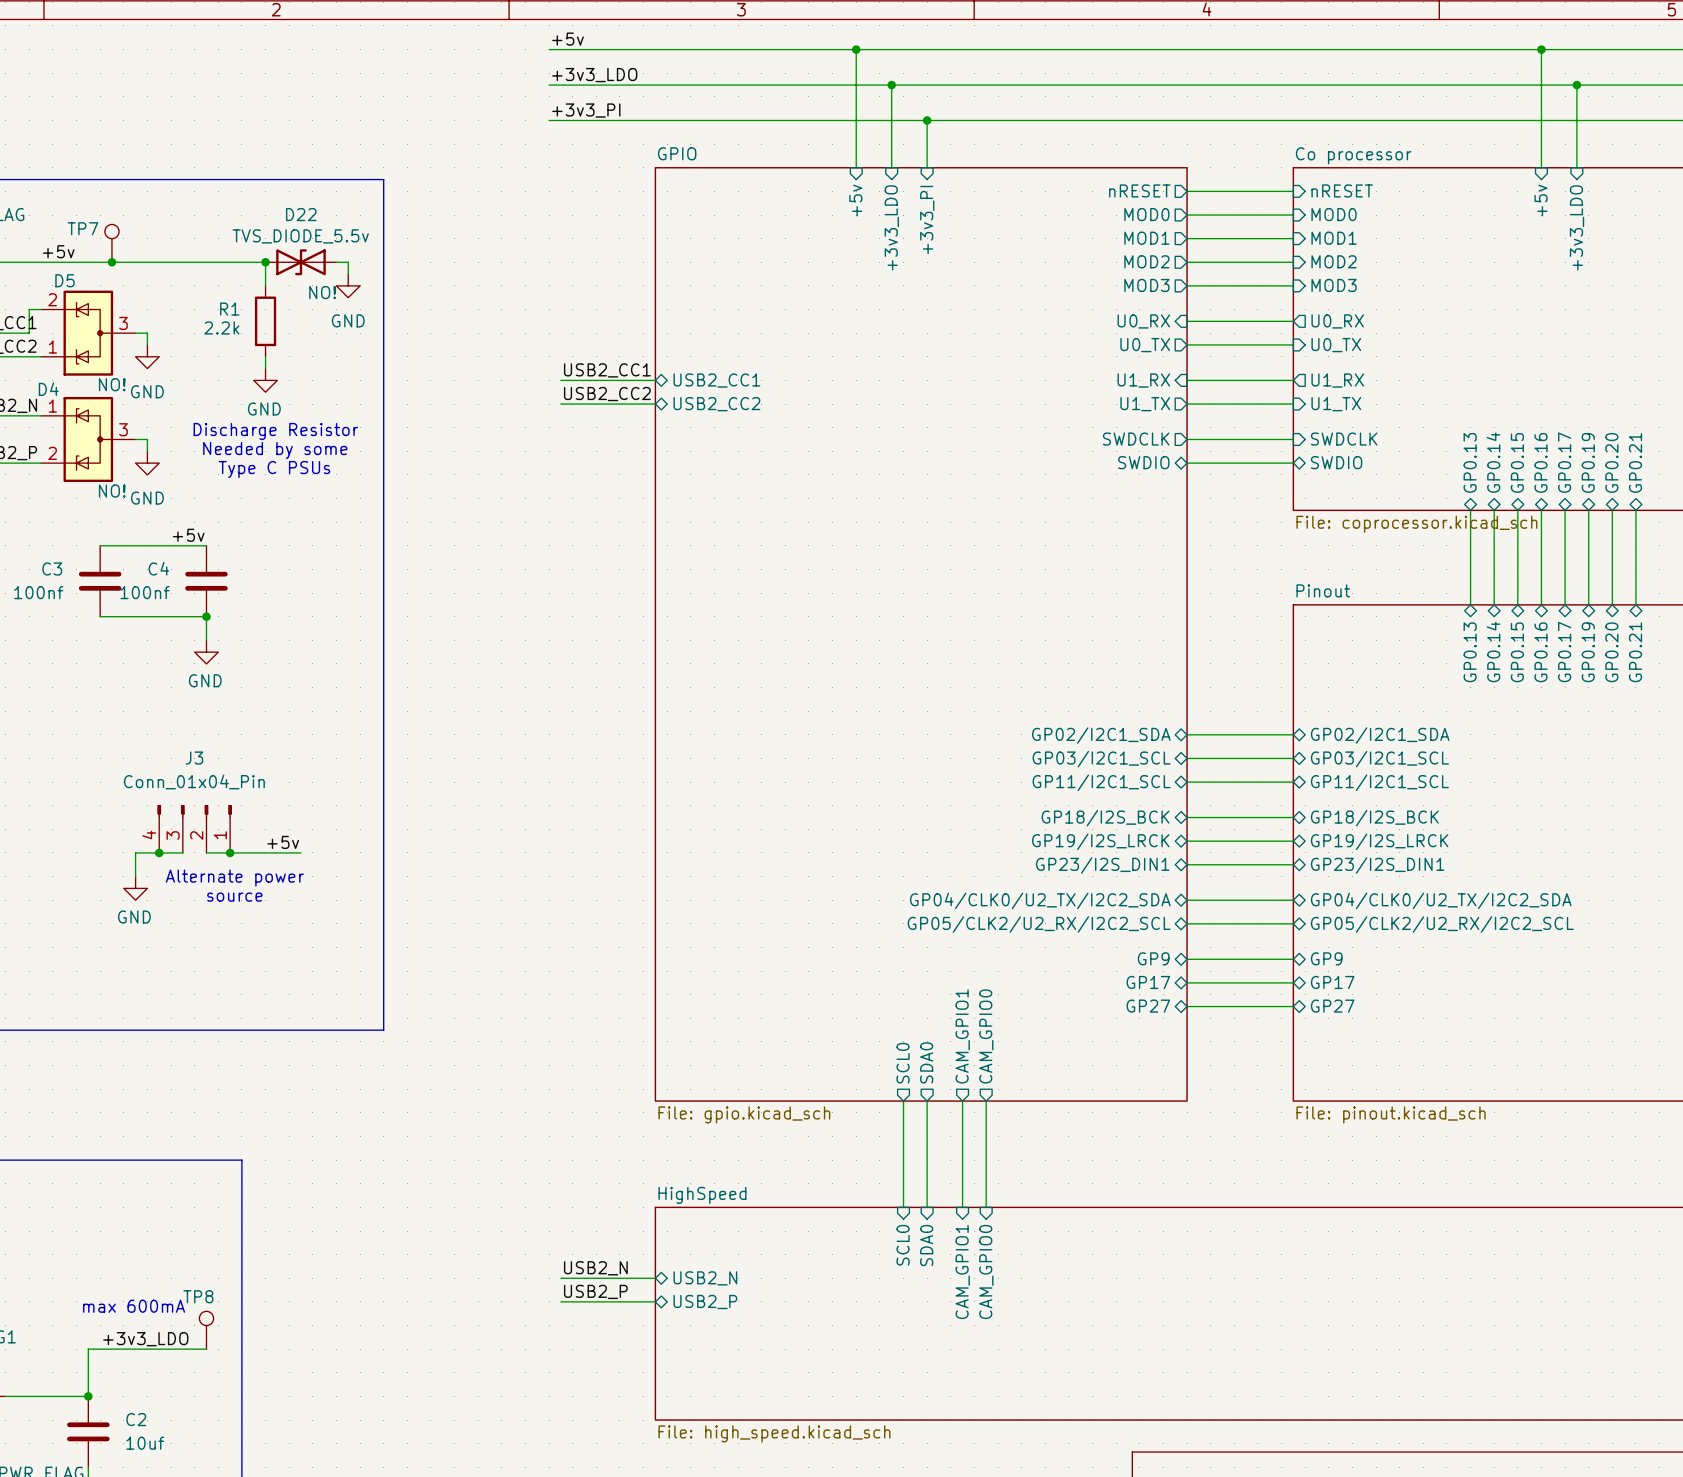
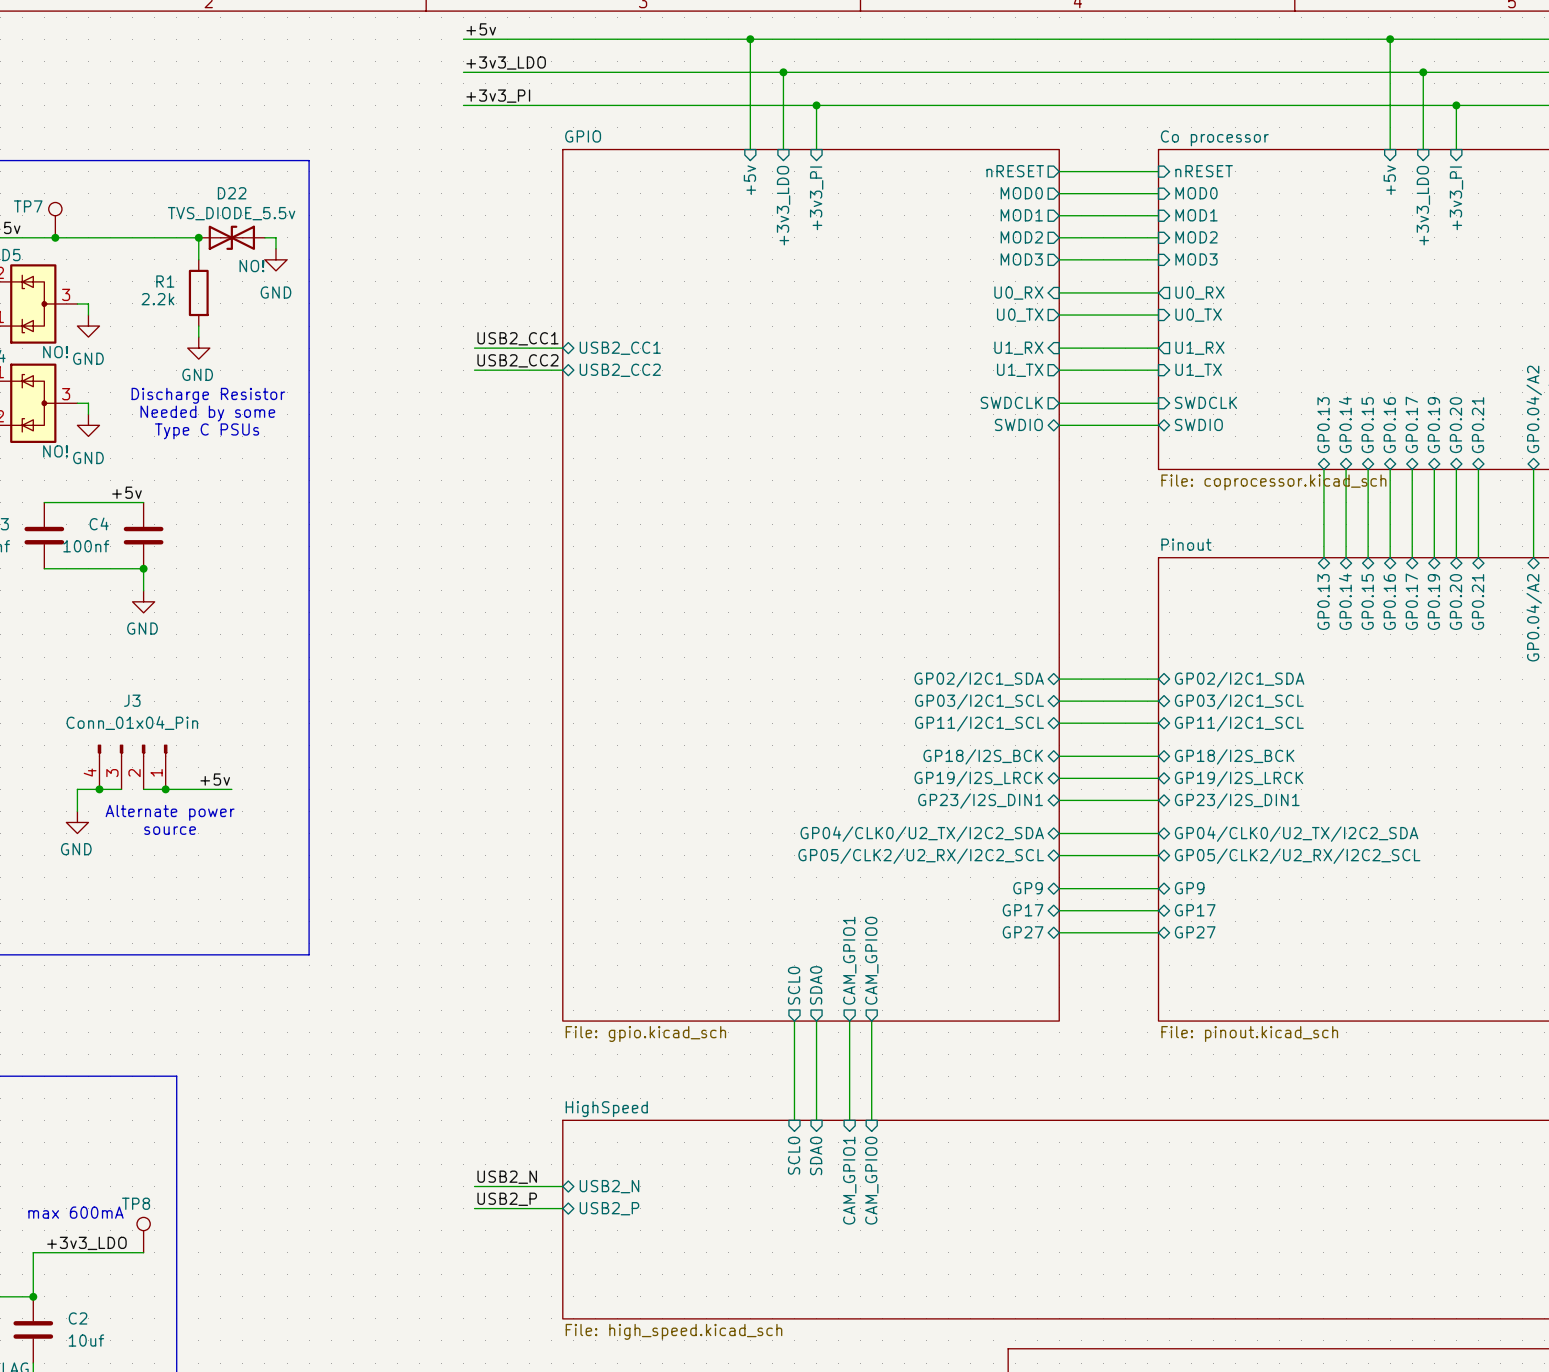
wire: none -> (1456, 105) (1456, 149)
junction: none -> (1456, 105)
sheet pin: none -> +3v3_PI (1456, 198)

